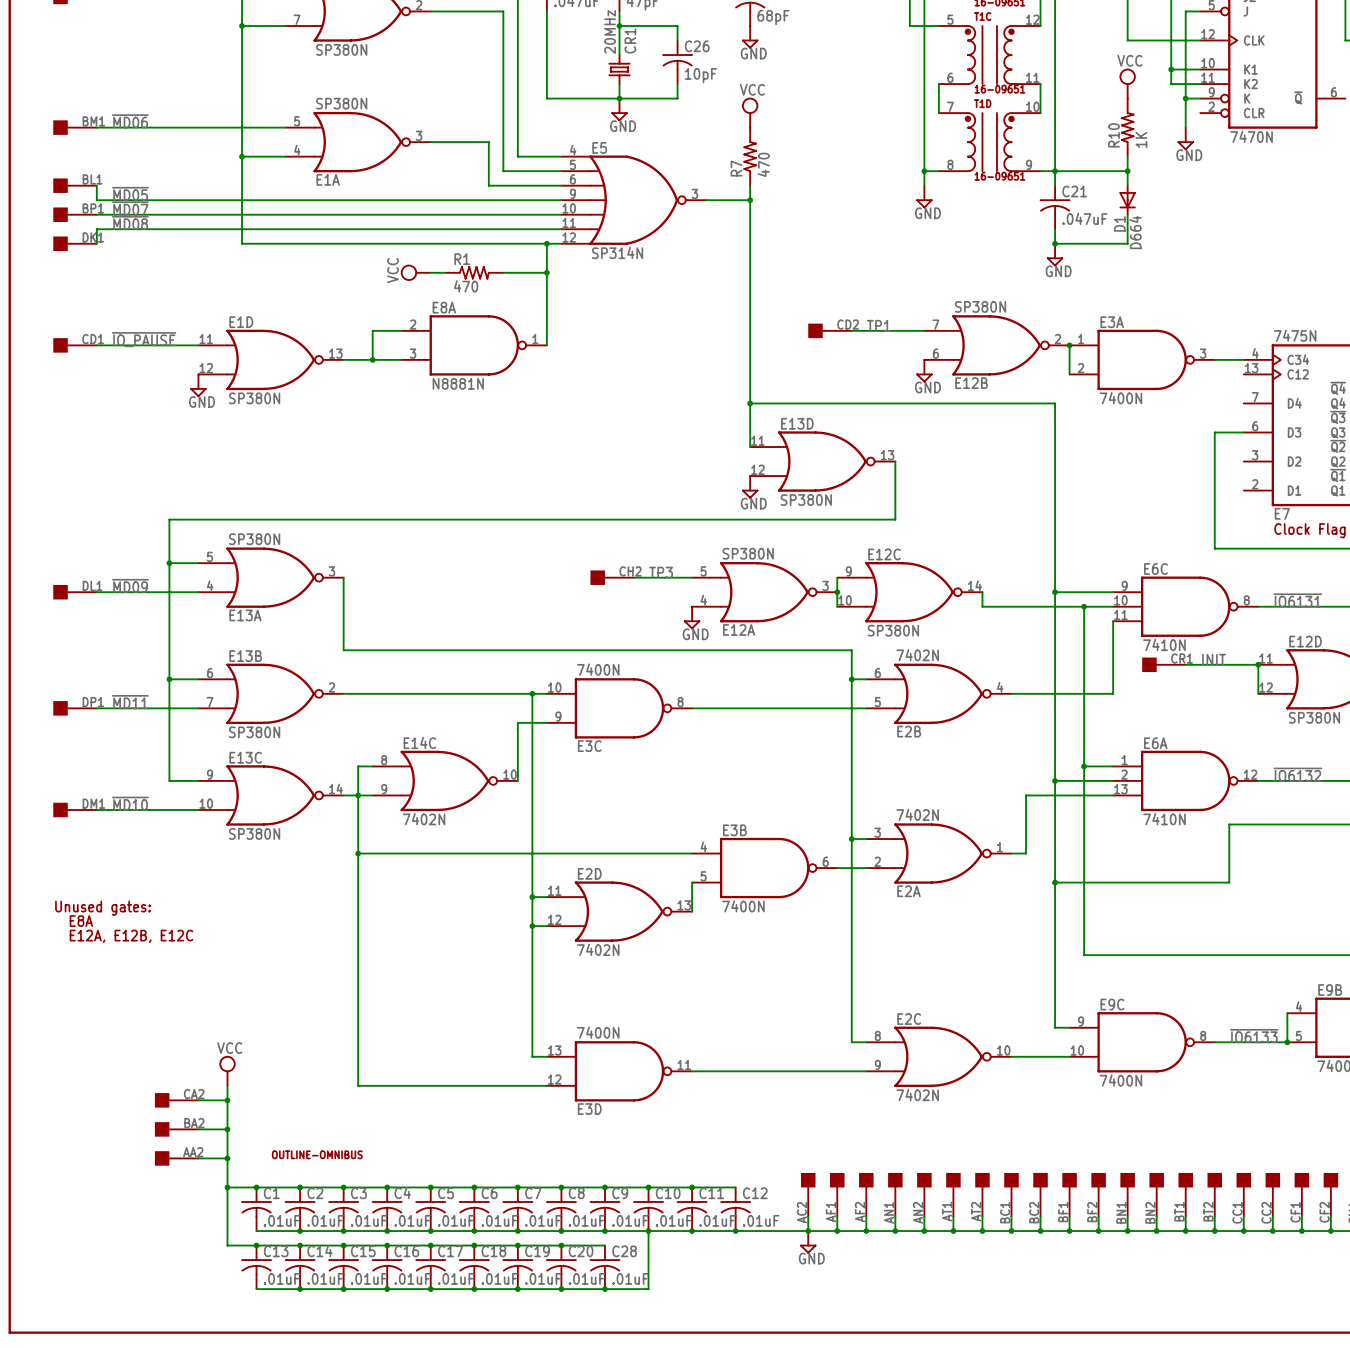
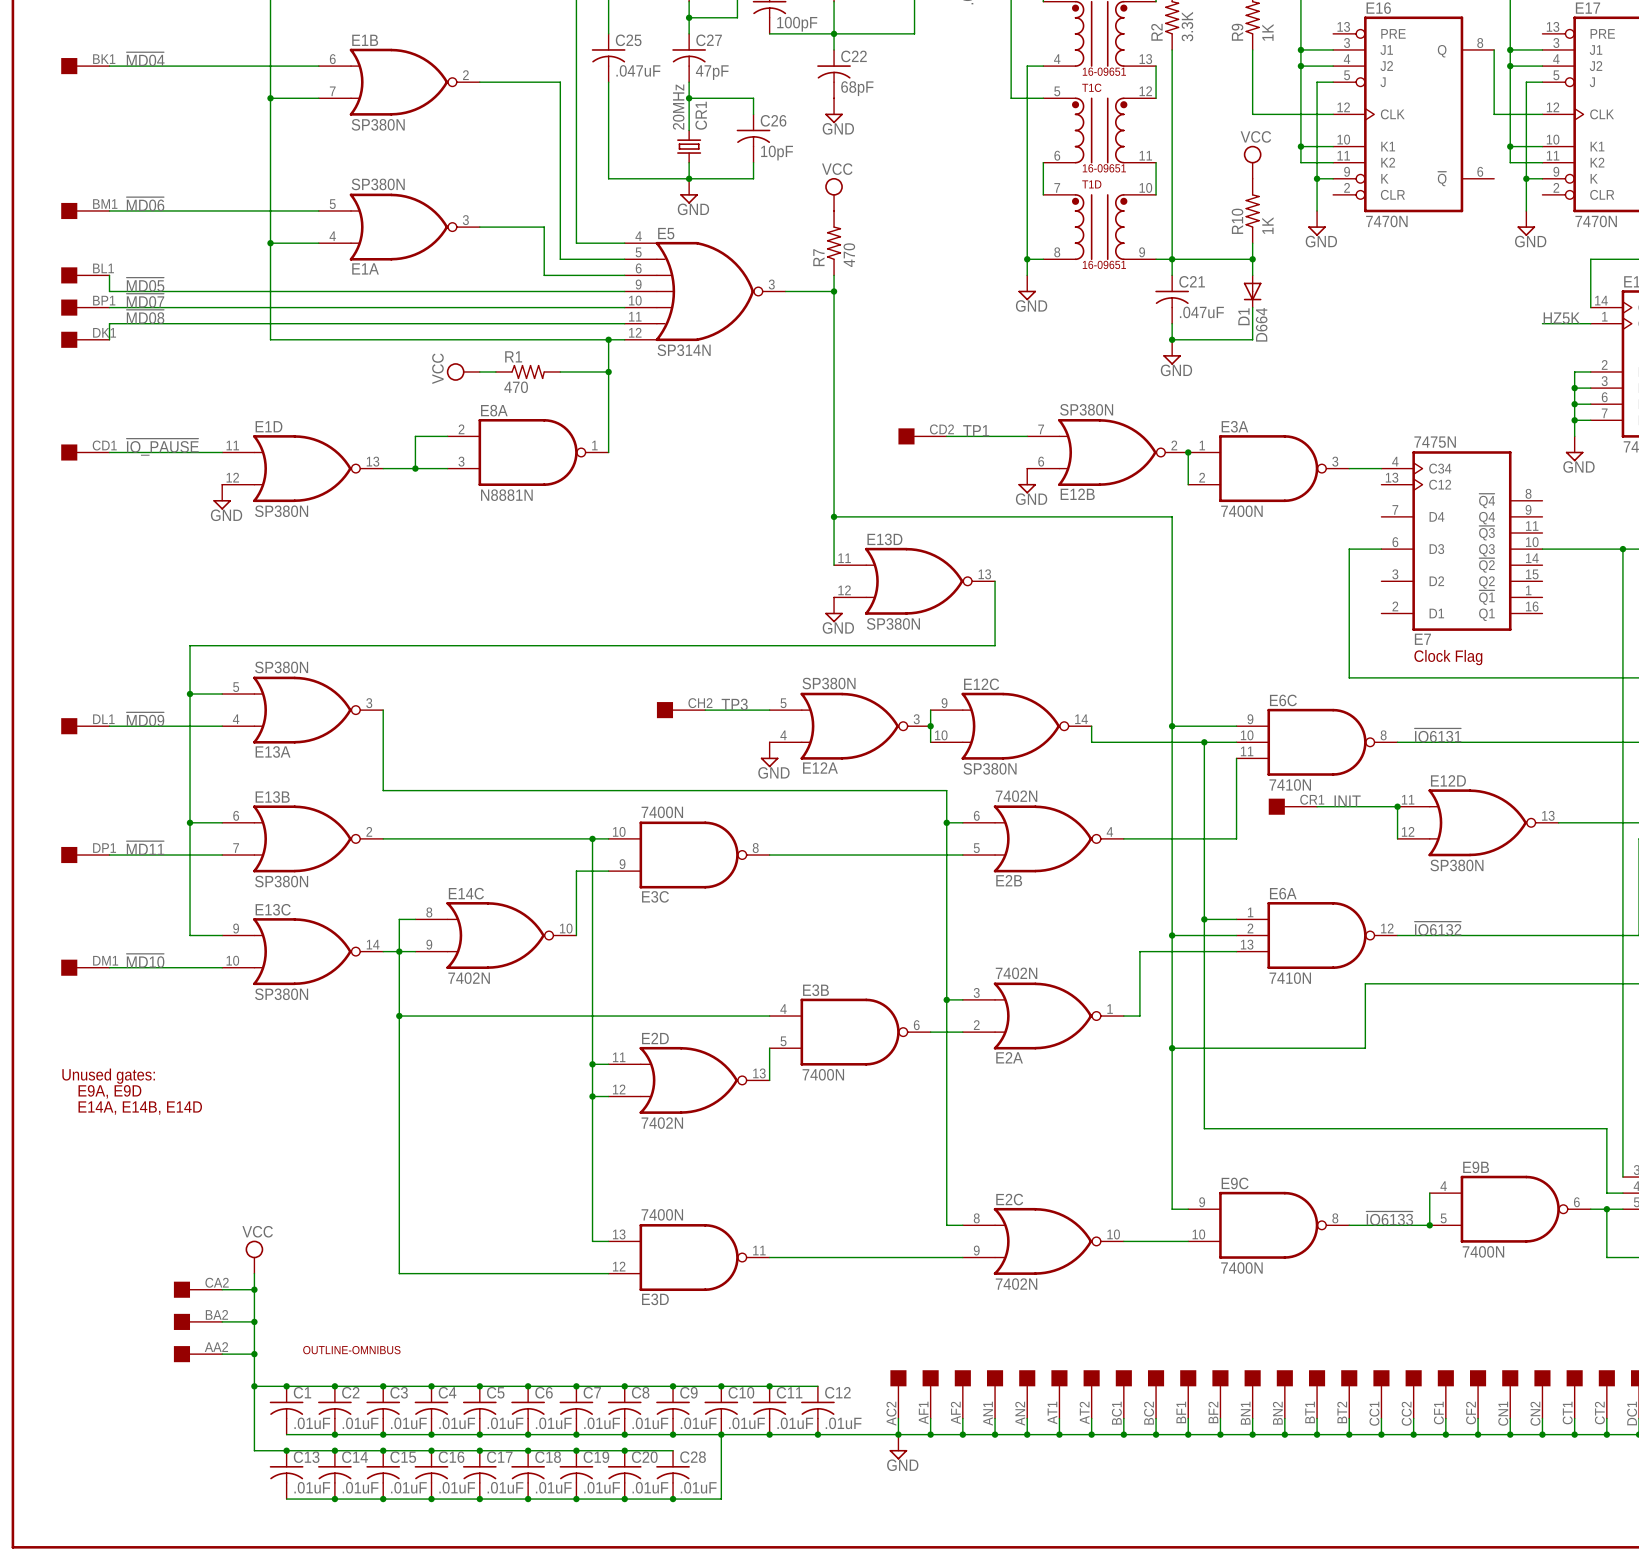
text: E8A (81, 921) -> E9A, E9D (109, 1091)
text: E12A, E12B, E12C (131, 936) -> E14A, E14B, E14D (140, 1108)

